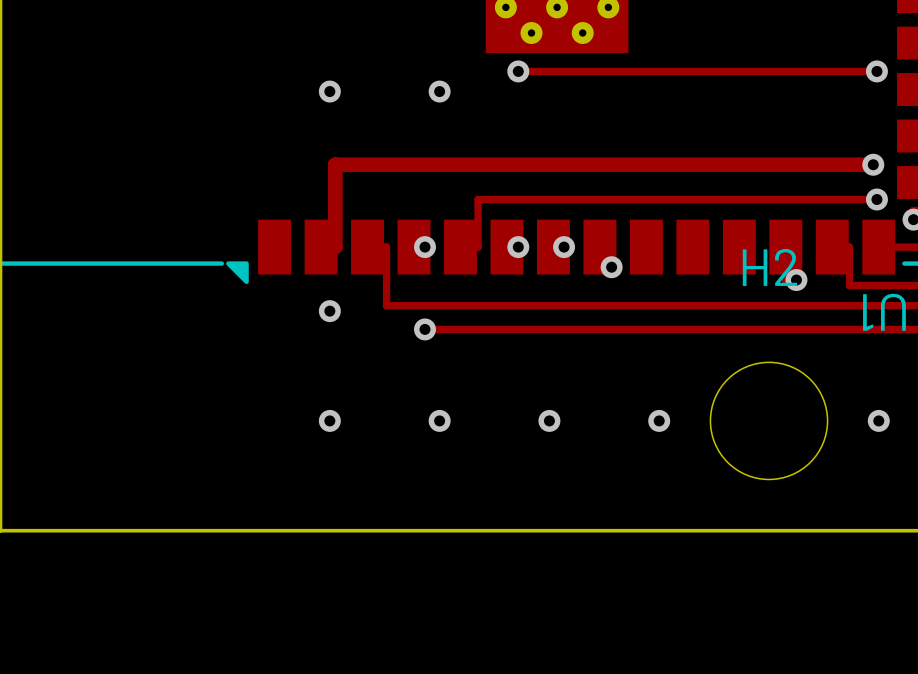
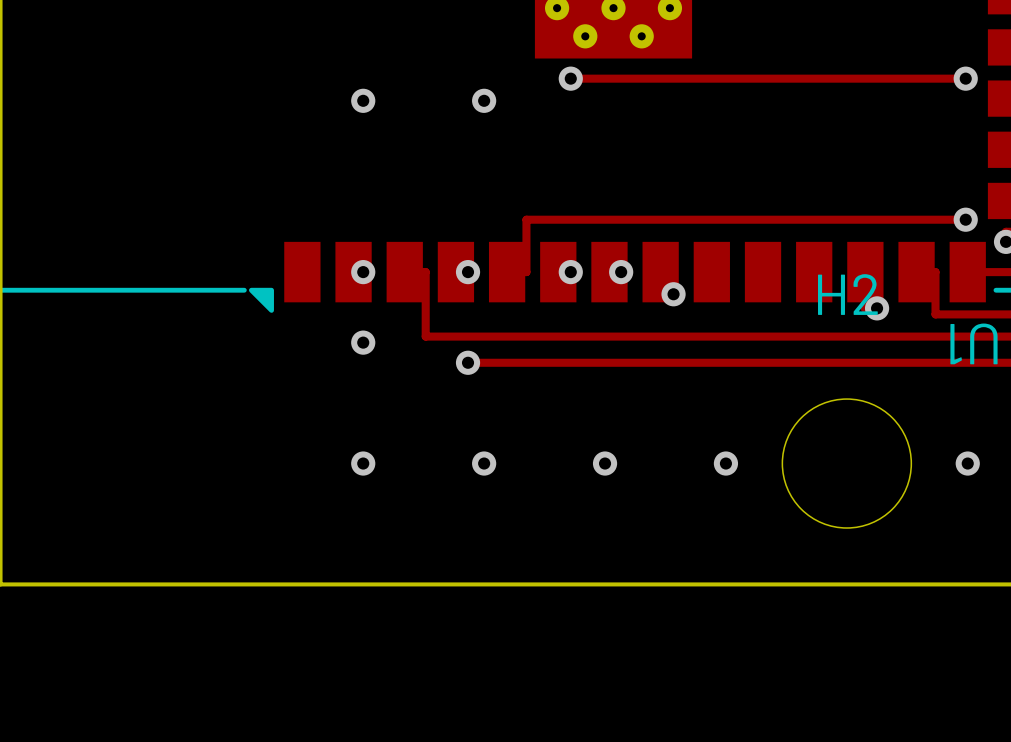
track: (873, 164) (335, 164) (335, 247) (329, 247) -> none
via: (873, 164) -> none
via: none -> (363, 272)

